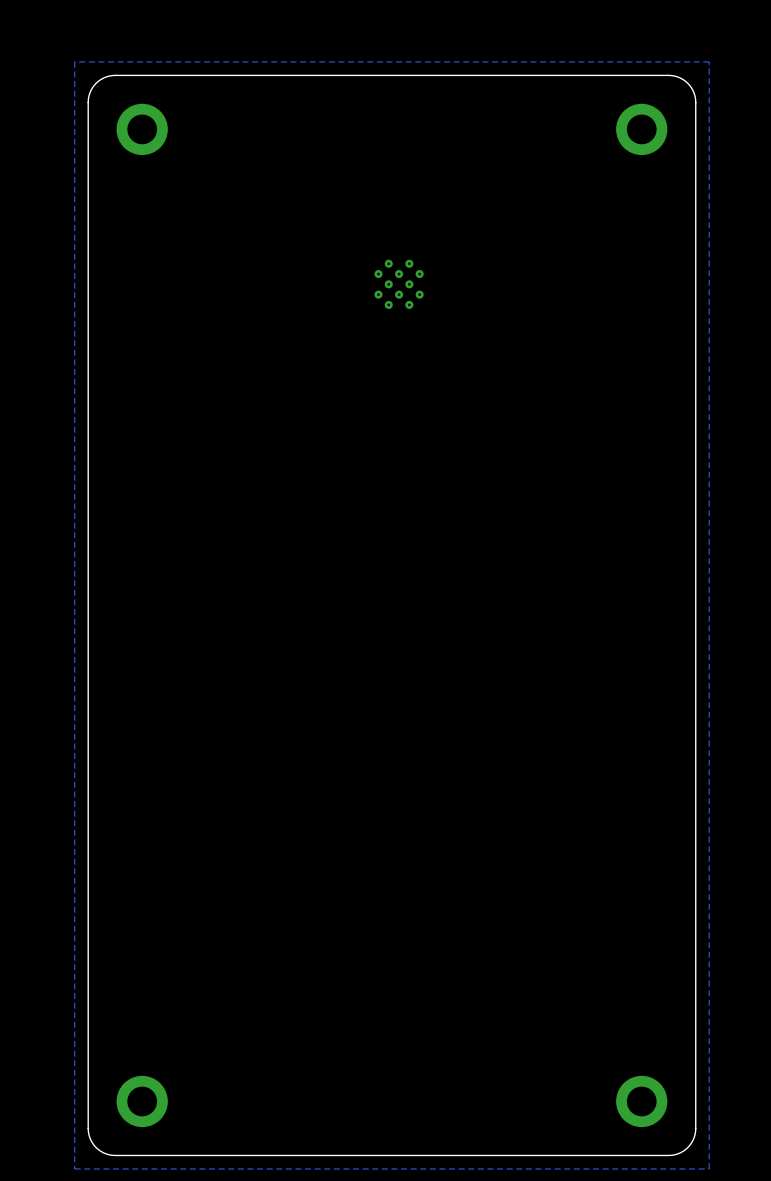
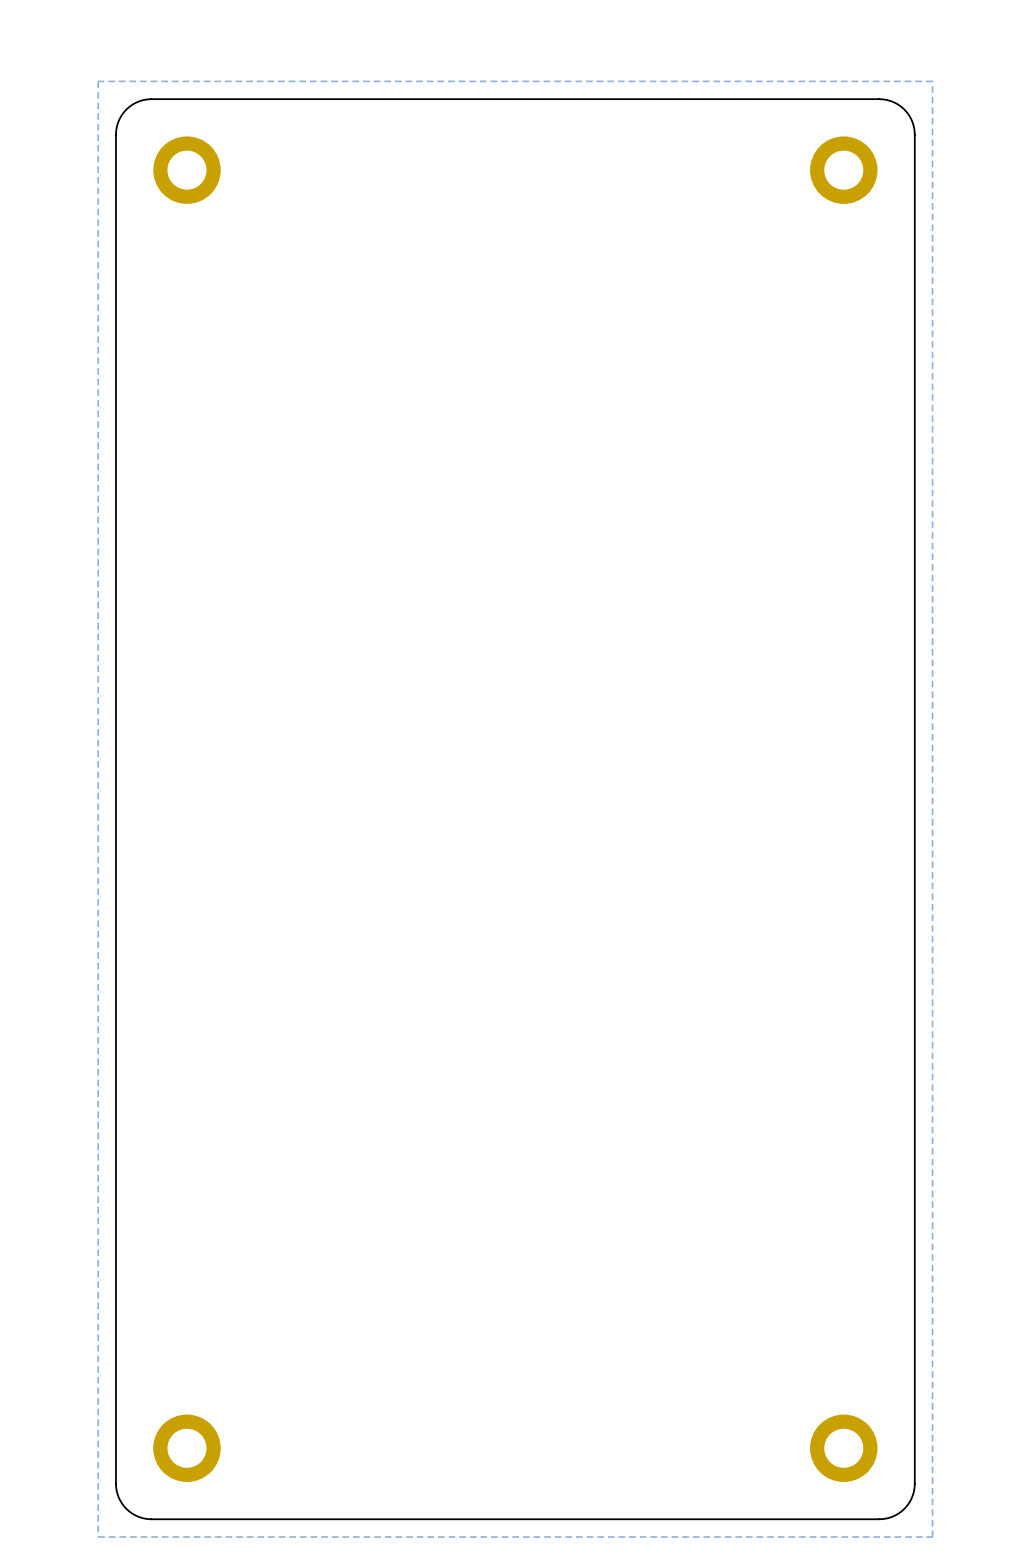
part: (399, 284) -> none

